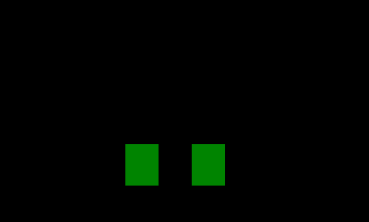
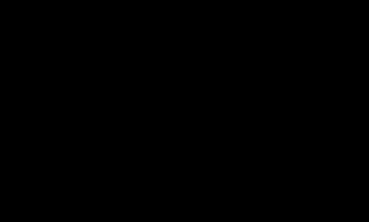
part: (175, 164) -> none

